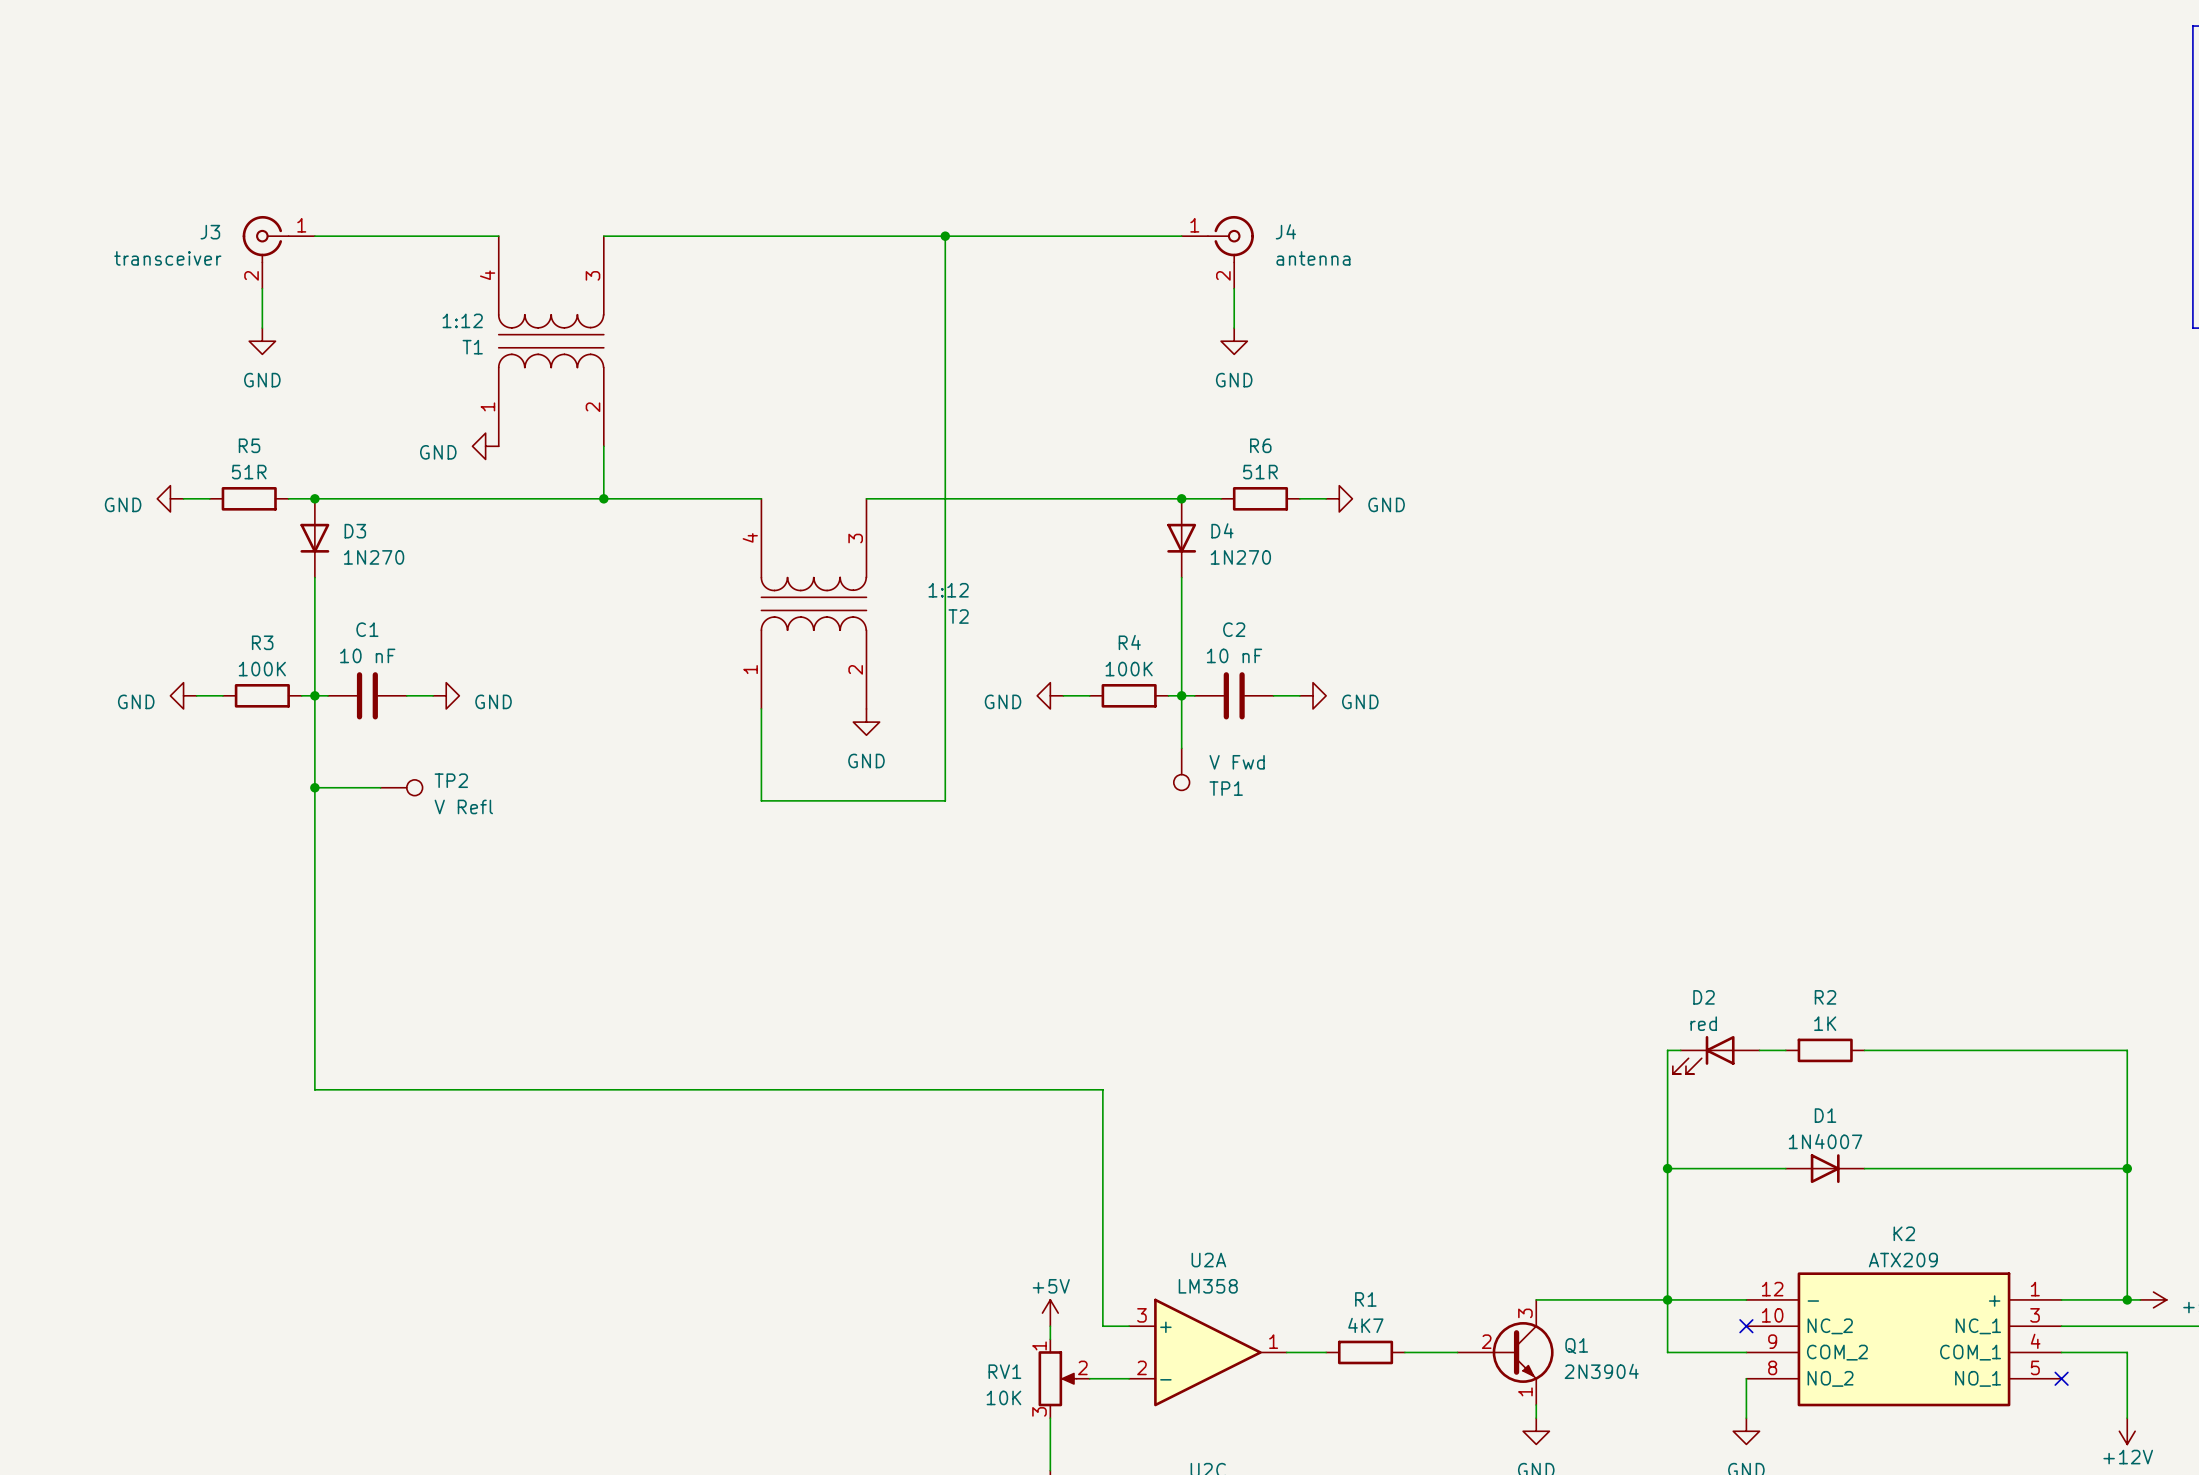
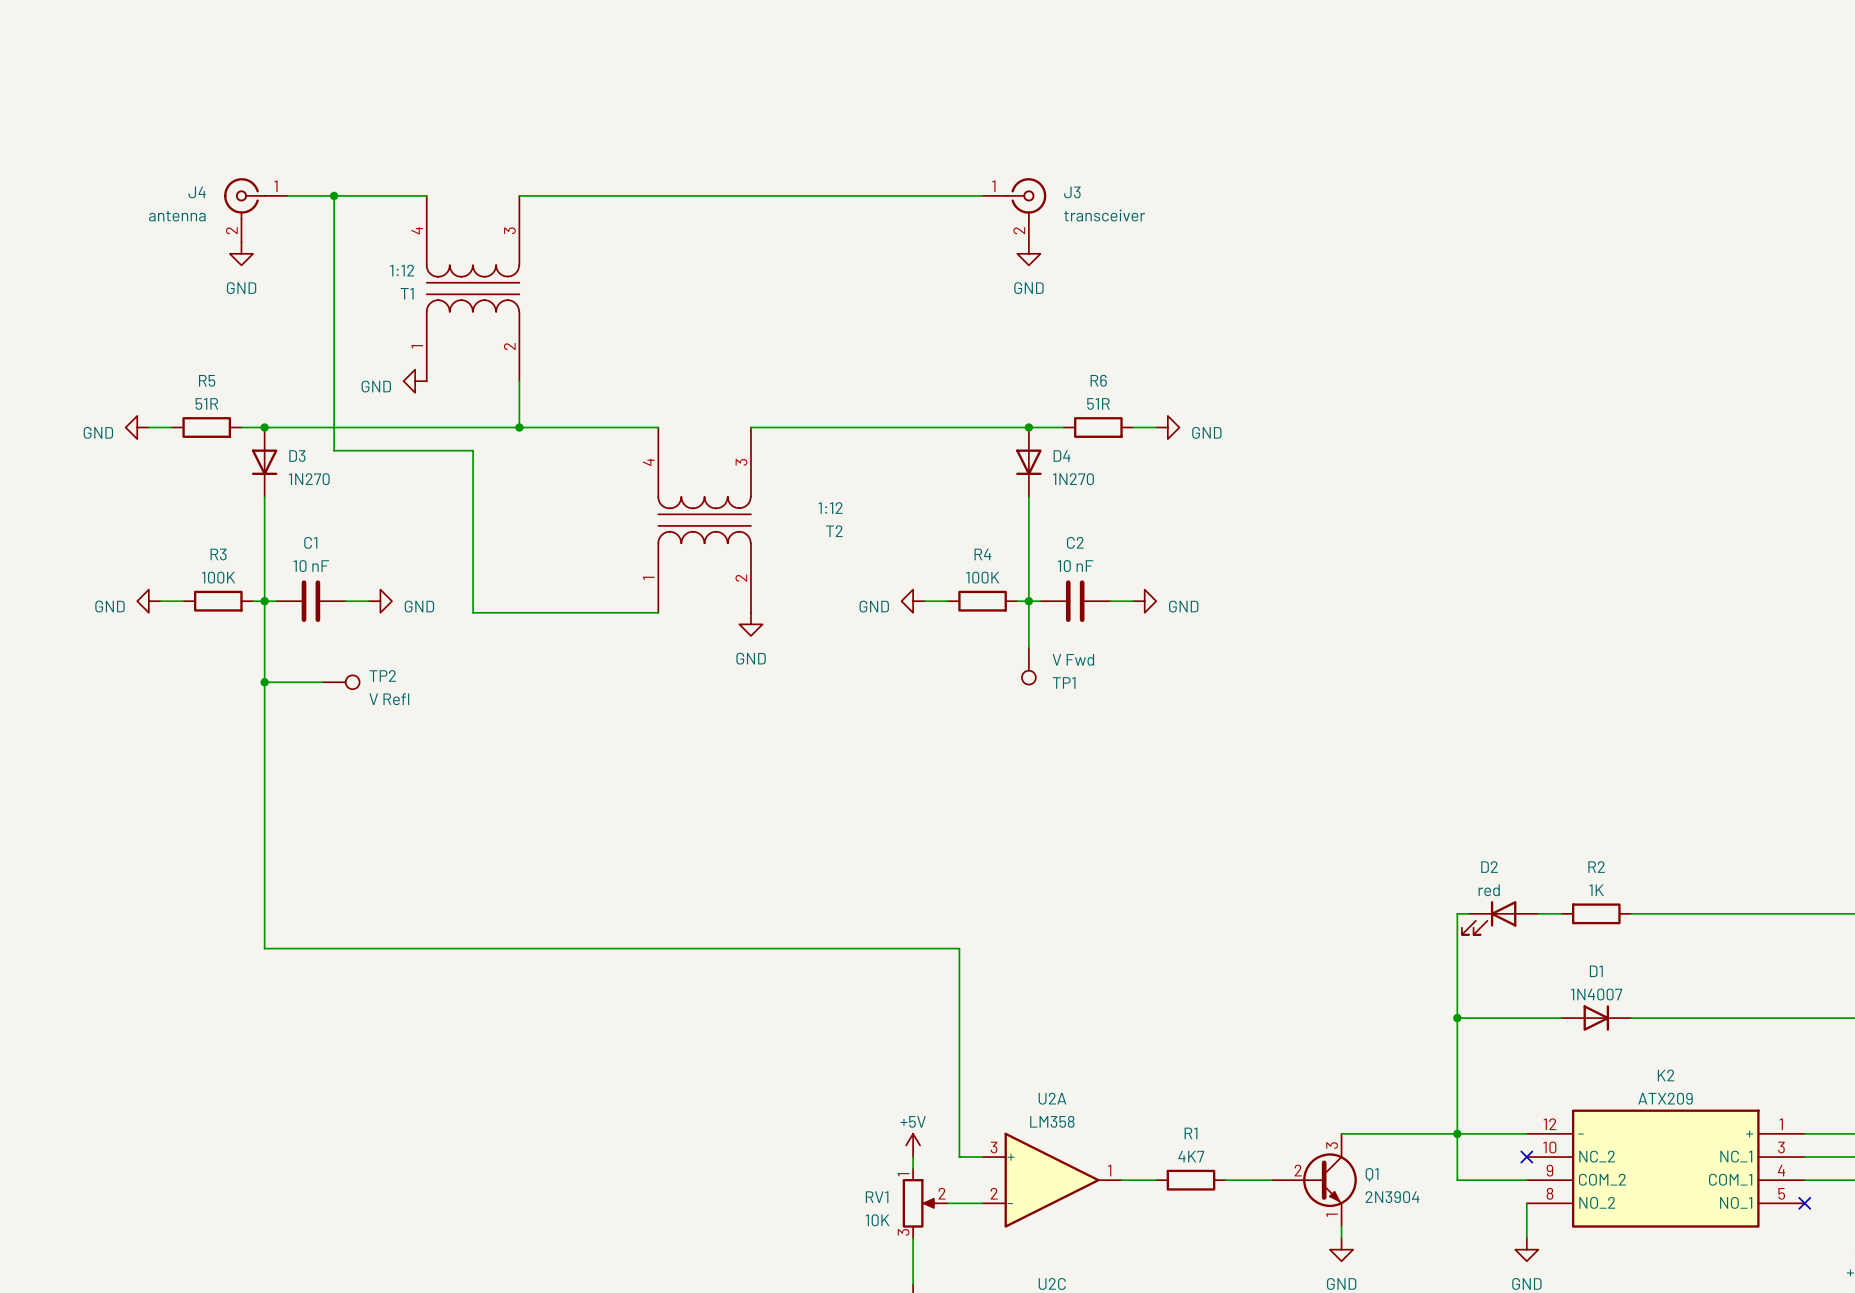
junction: none -> (334, 195)
wire: (945, 236) (945, 800) (761, 800) (761, 708) -> (334, 195) (334, 450) (473, 450) (473, 612) (658, 612)
junction: (945, 236) -> none
J3 flip: as is (265, 239) -> left-right (1026, 198)
J4 flip: as is (1230, 239) -> left-right (244, 198)
J3 position: (278, 252) -> (1014, 210)
J4 position: (1217, 252) -> (255, 210)
wire: (262, 288) (262, 328) -> none
wire: (1234, 288) (1234, 328) -> none
power symbol position: GND (262, 341) -> GND (241, 253)
power symbol position: GND (1234, 341) -> GND (1028, 253)

